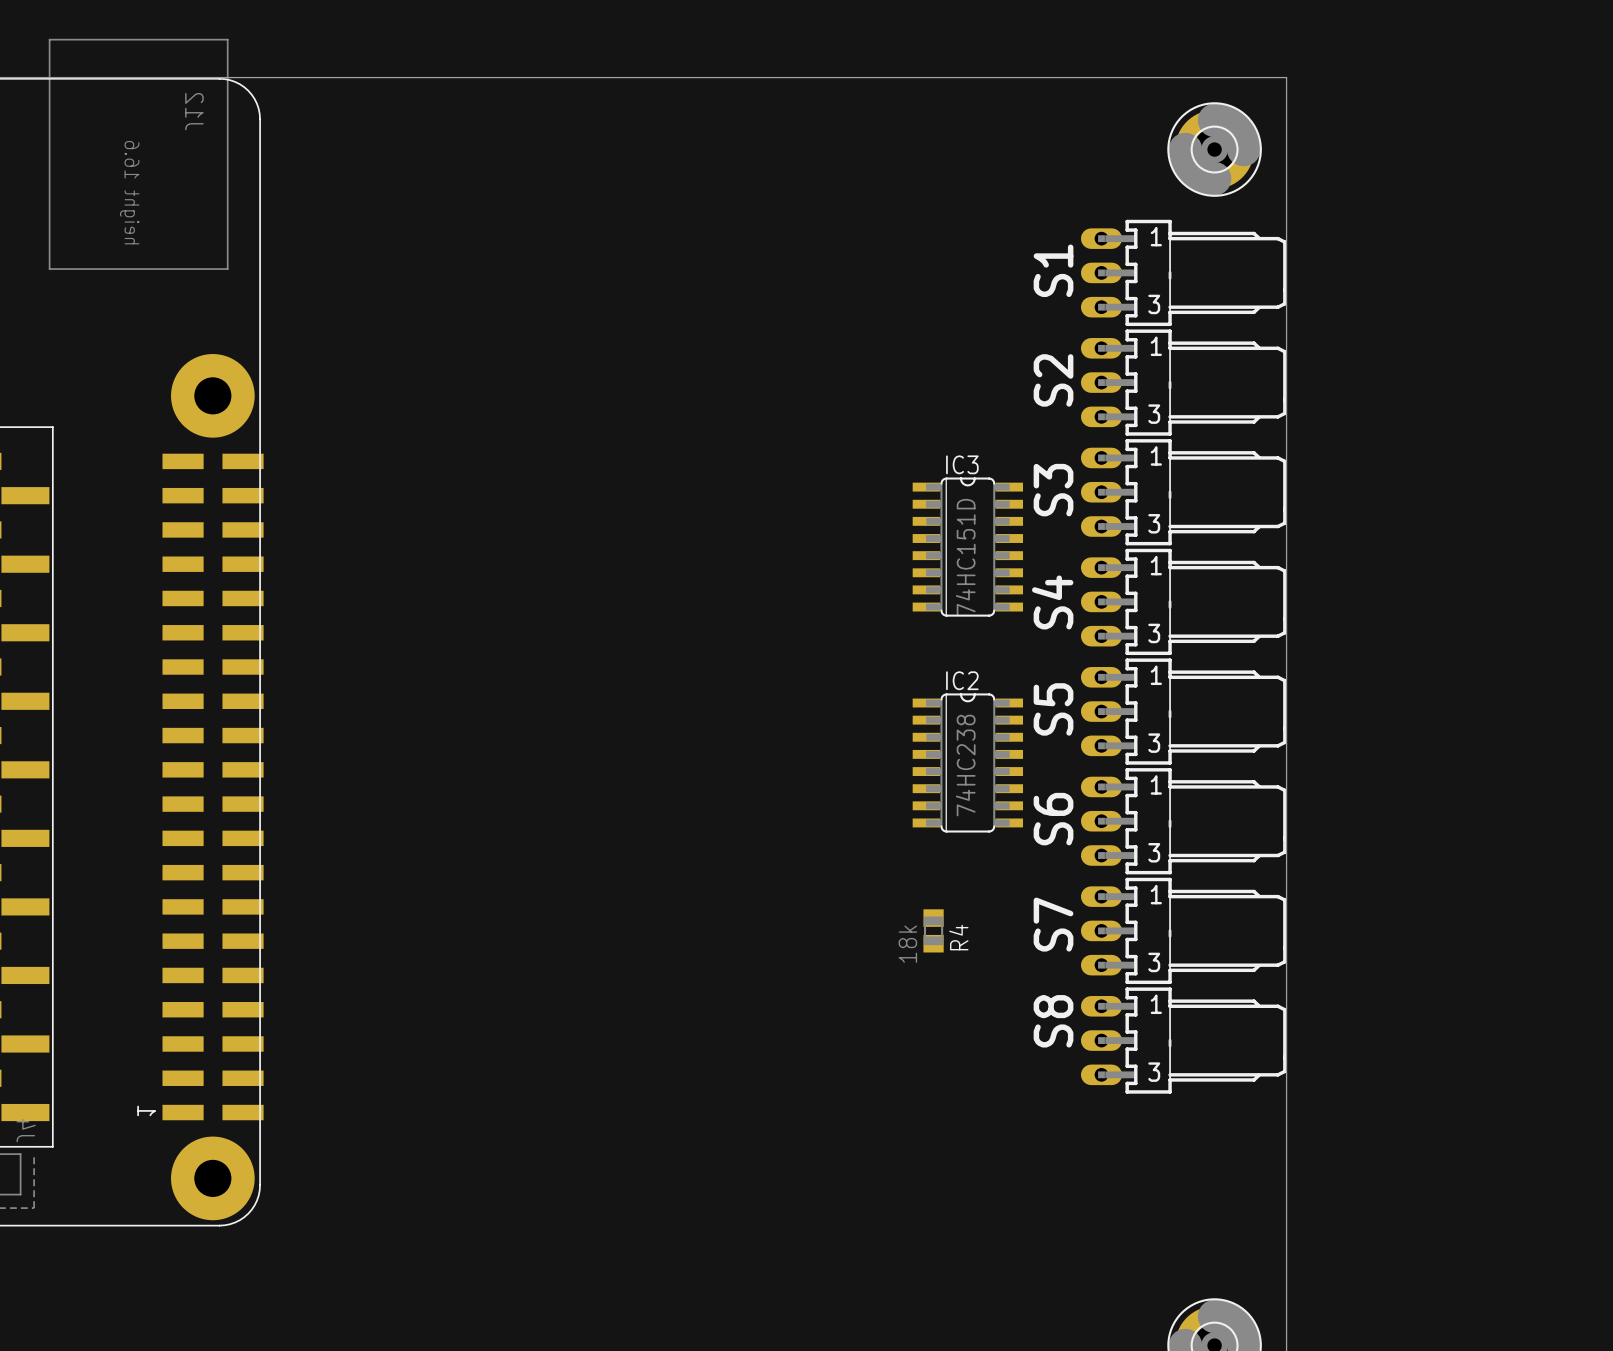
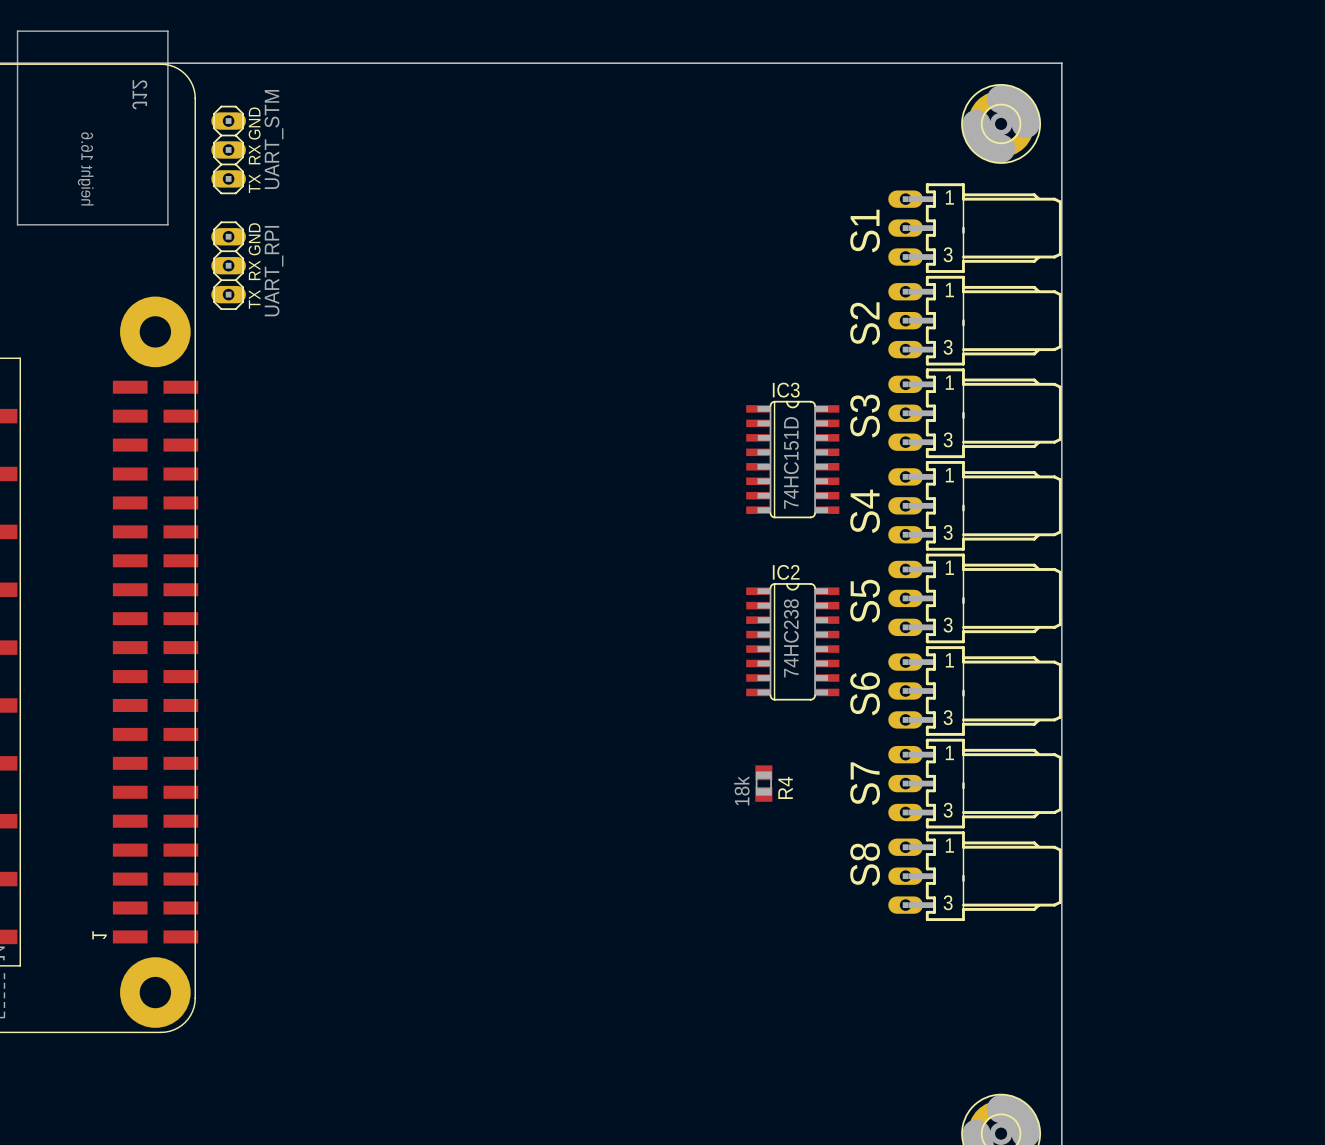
text: none -> TX RX GND (254, 150)
part: none -> UART_STM (228, 149)
text: none -> TX RX GND (254, 265)
part: none -> UART_RPI (228, 265)

